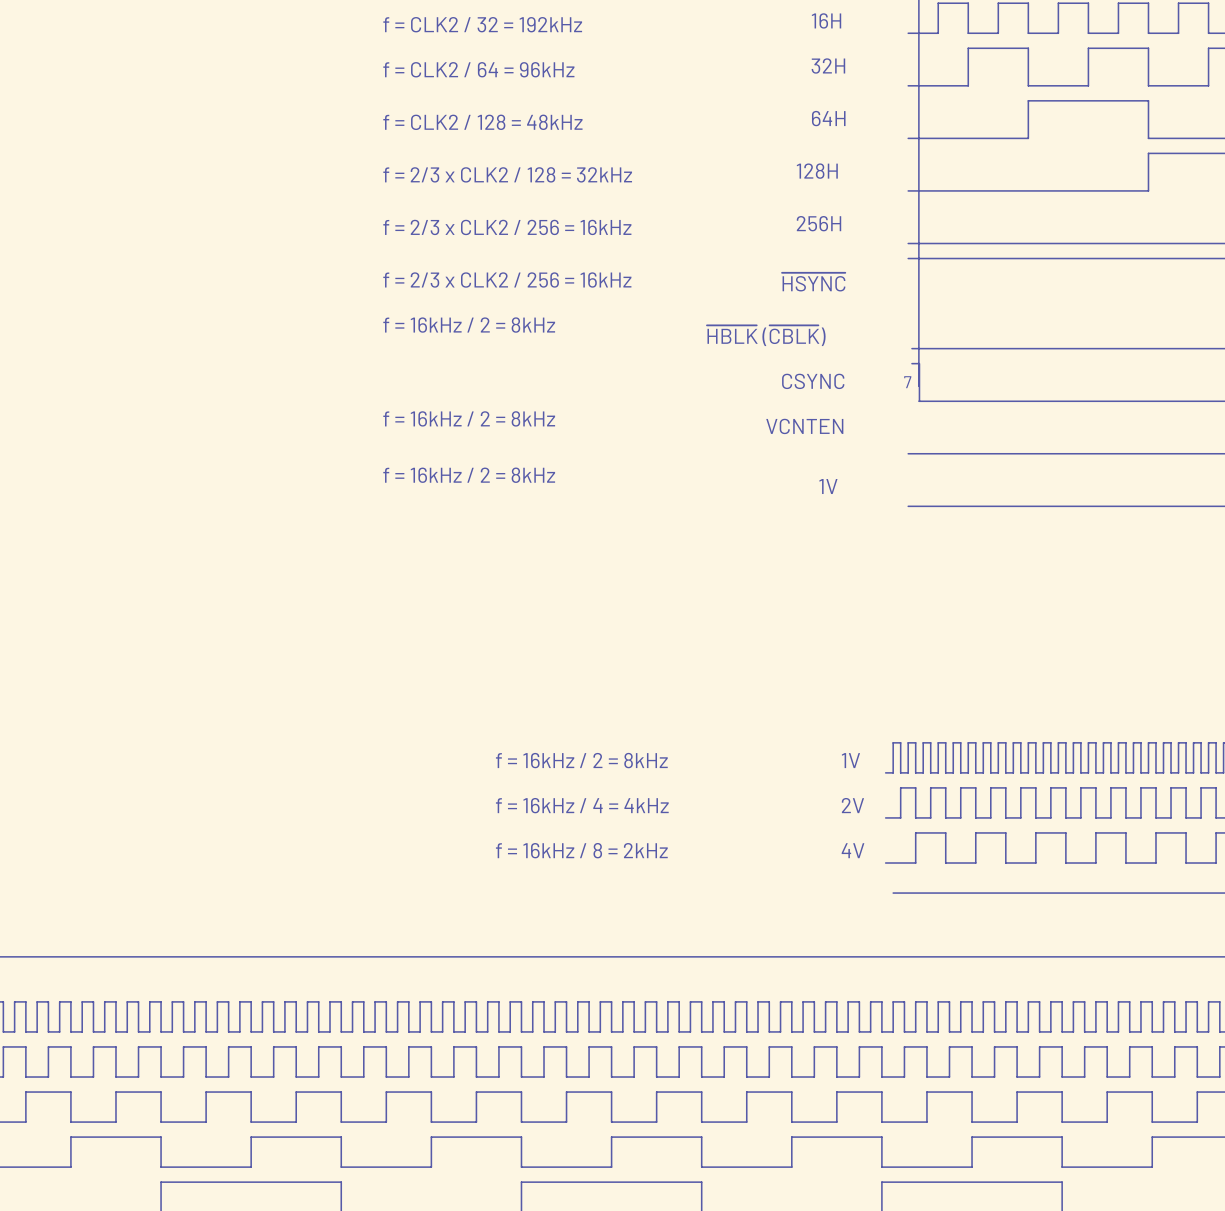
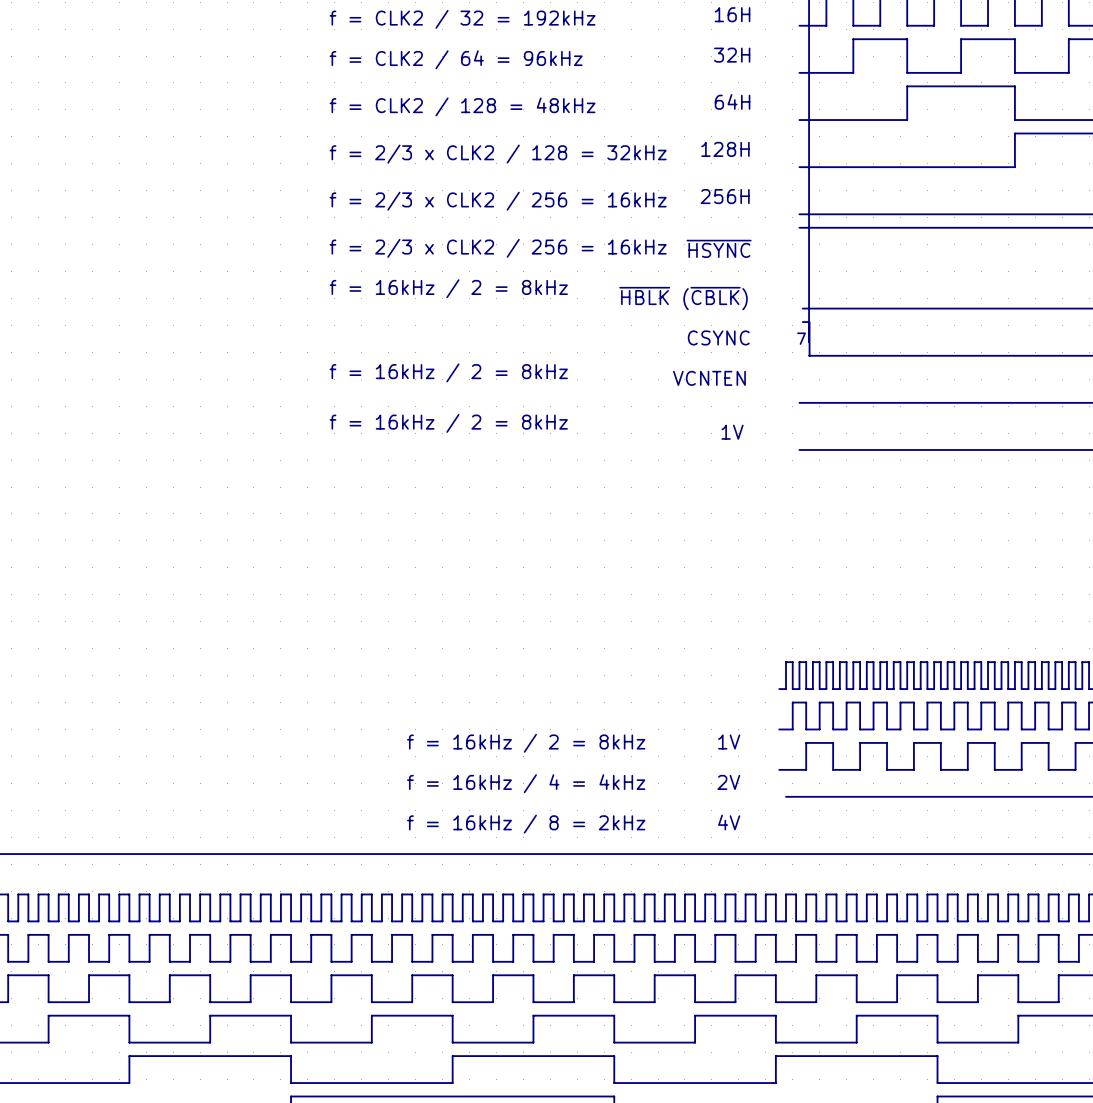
text position: f = 16kHz / 2 = 8kHz (581, 760) -> f = 16kHz / 2 = 8kHz (526, 743)
text position: 1V (850, 760) -> 1V (729, 742)
text position: f = 16kHz / 4 = 4kHz (582, 805) -> f = 16kHz / 4 = 4kHz (526, 783)
text position: 2V (852, 805) -> 2V (728, 782)
text position: f = 16kHz / 8 = 2kHz (581, 850) -> f = 16kHz / 8 = 2kHz (526, 824)
text position: 4V (853, 850) -> 4V (729, 822)

